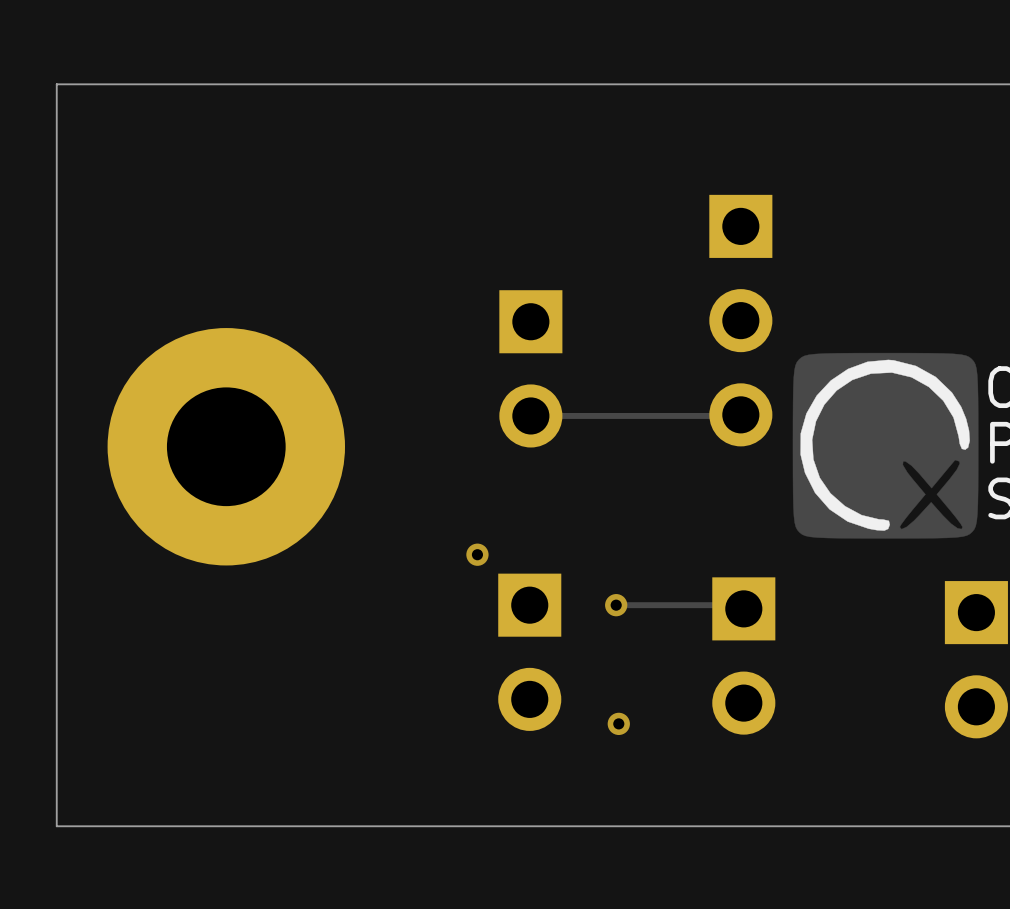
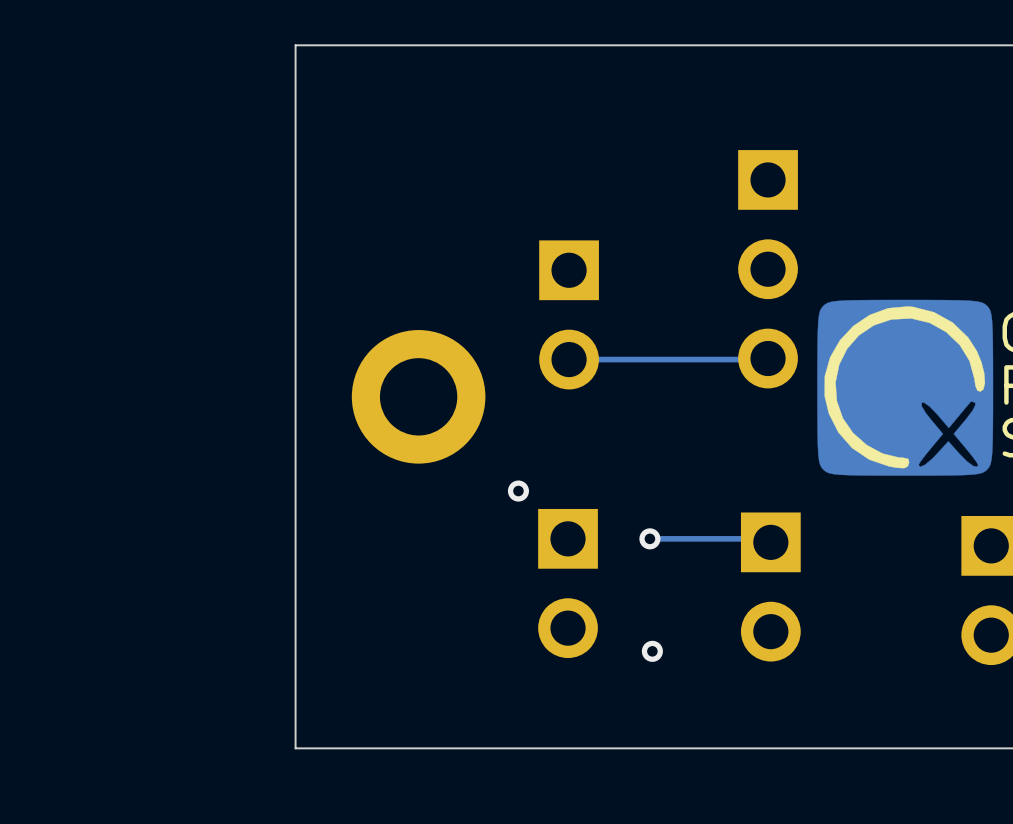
board edge: (242, 84) (56, 84) (56, 826) (242, 826) -> (295, 45) (295, 748)
part: (226, 446) -> none
part: none -> (418, 396)

